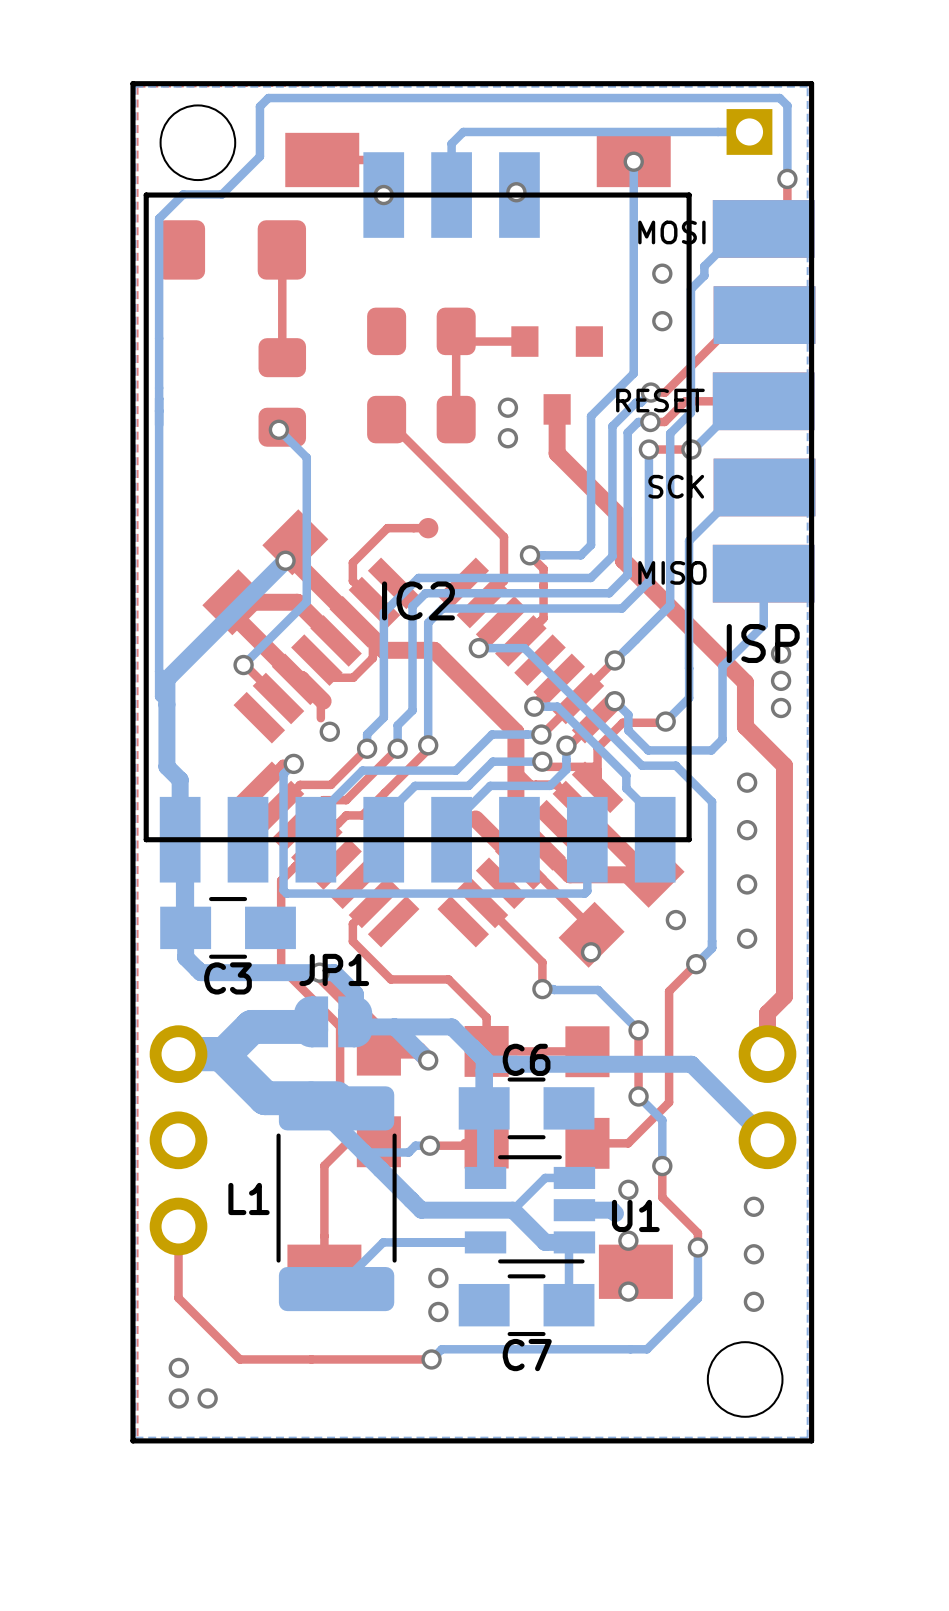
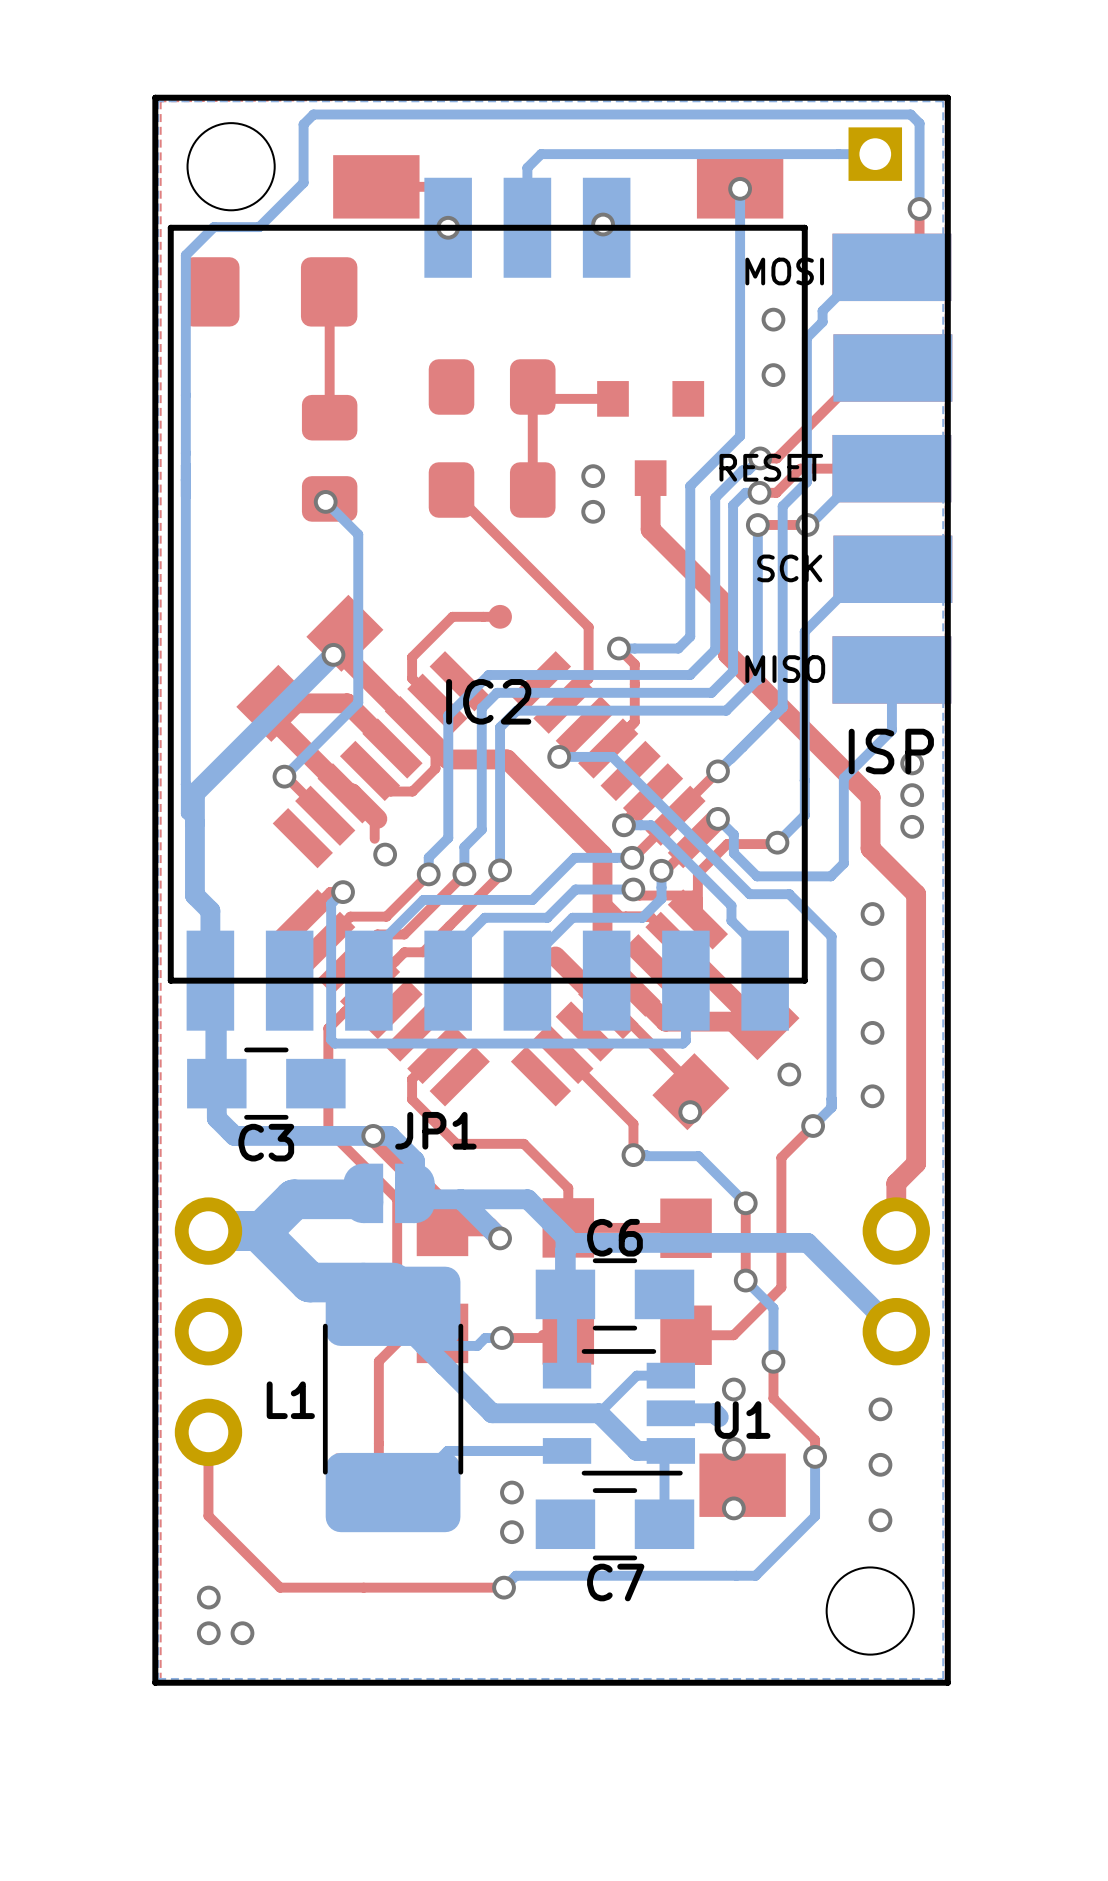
JP1 name position: JP1 (334, 969) -> JP1 (435, 1130)
L1 footprint: [276, 1086, 397, 1312] -> [322, 1266, 464, 1533]

